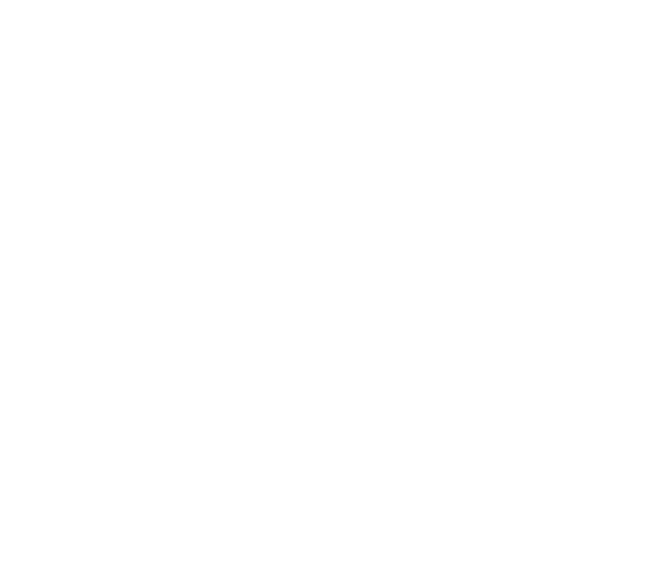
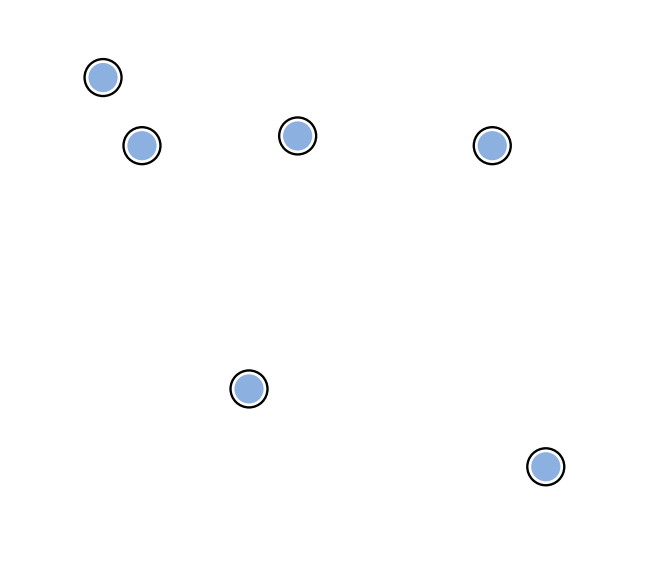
part: none -> (103, 77)
part: none -> (297, 135)
part: none -> (141, 145)
part: none -> (492, 145)
part: none -> (249, 388)
part: none -> (545, 466)

